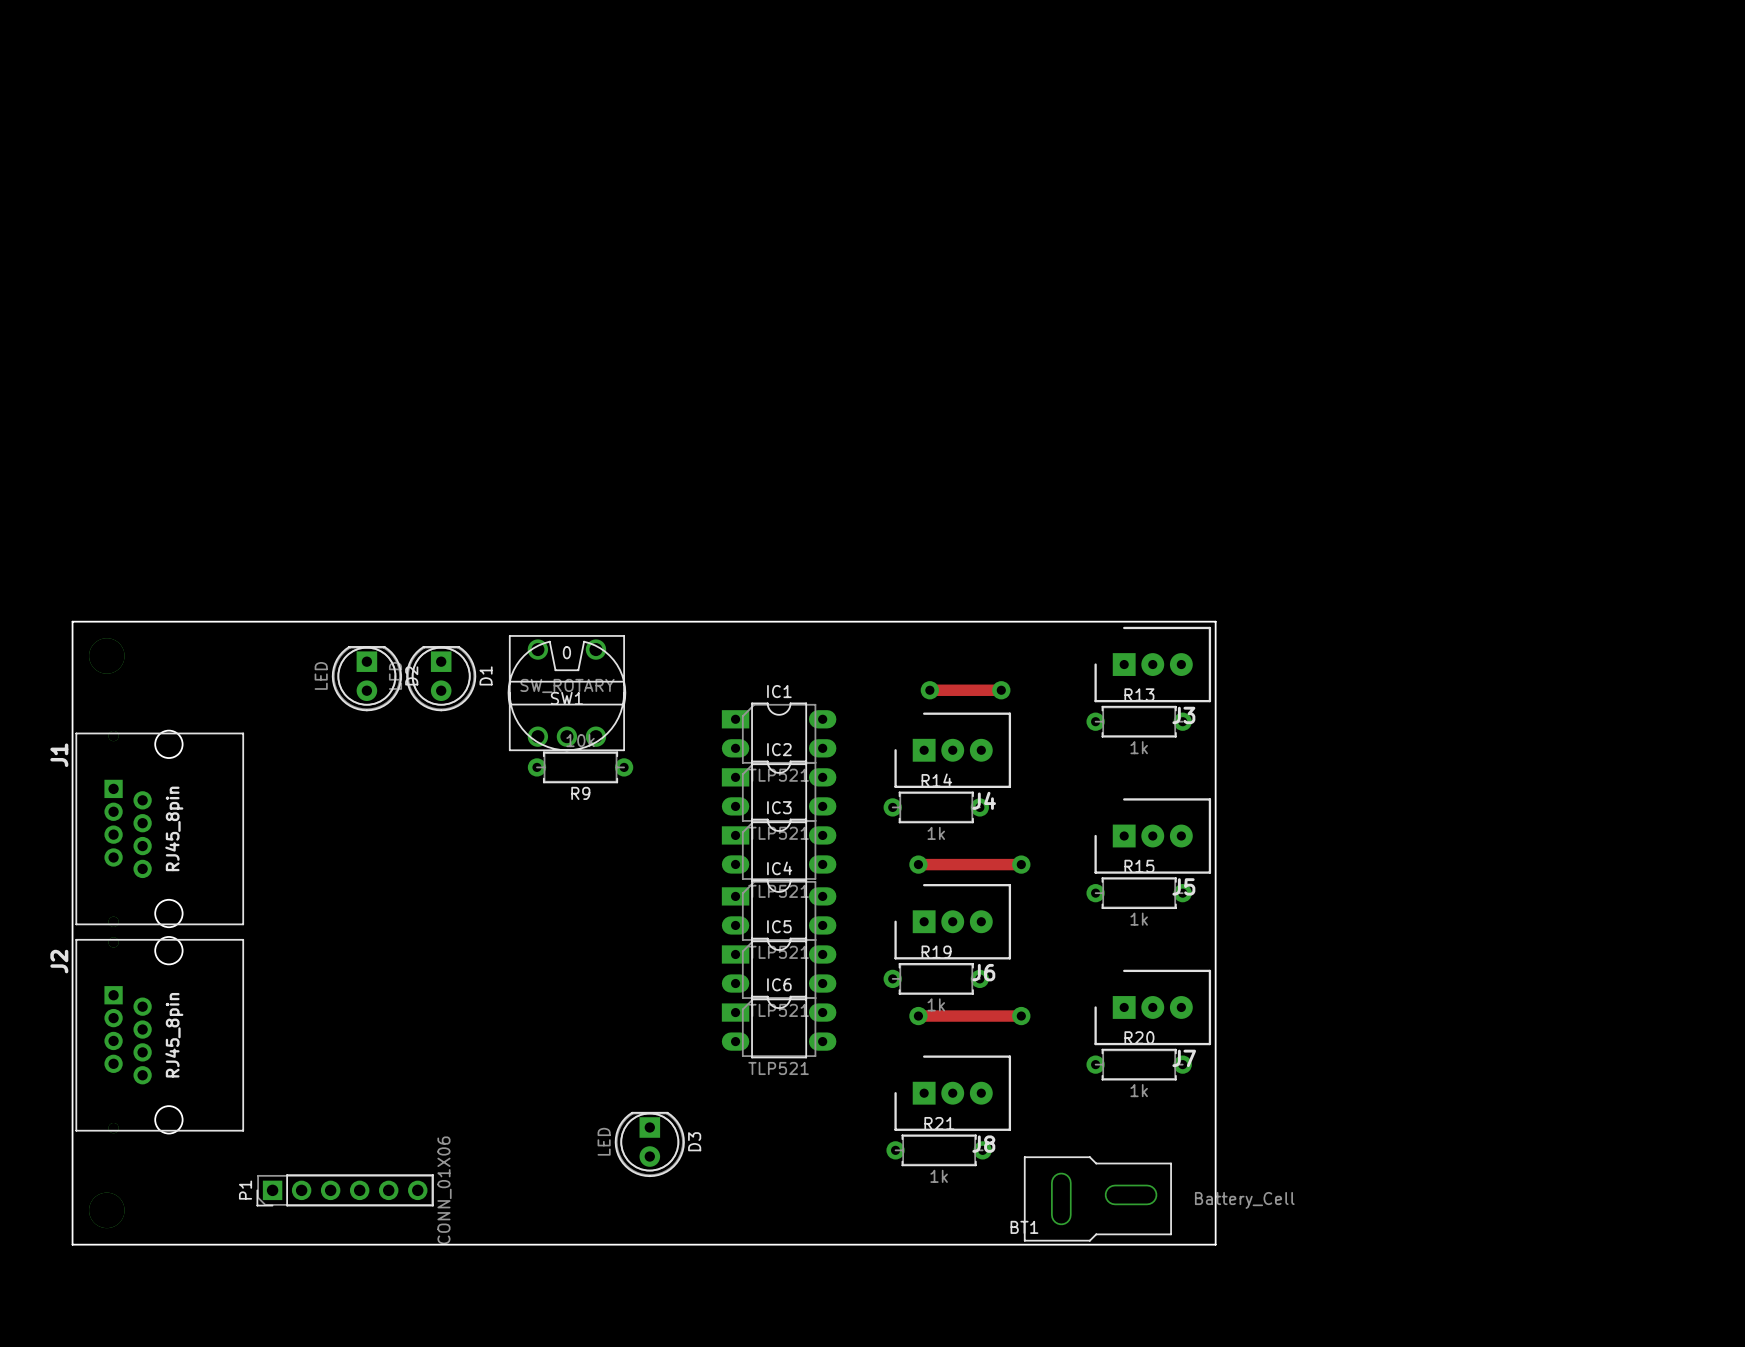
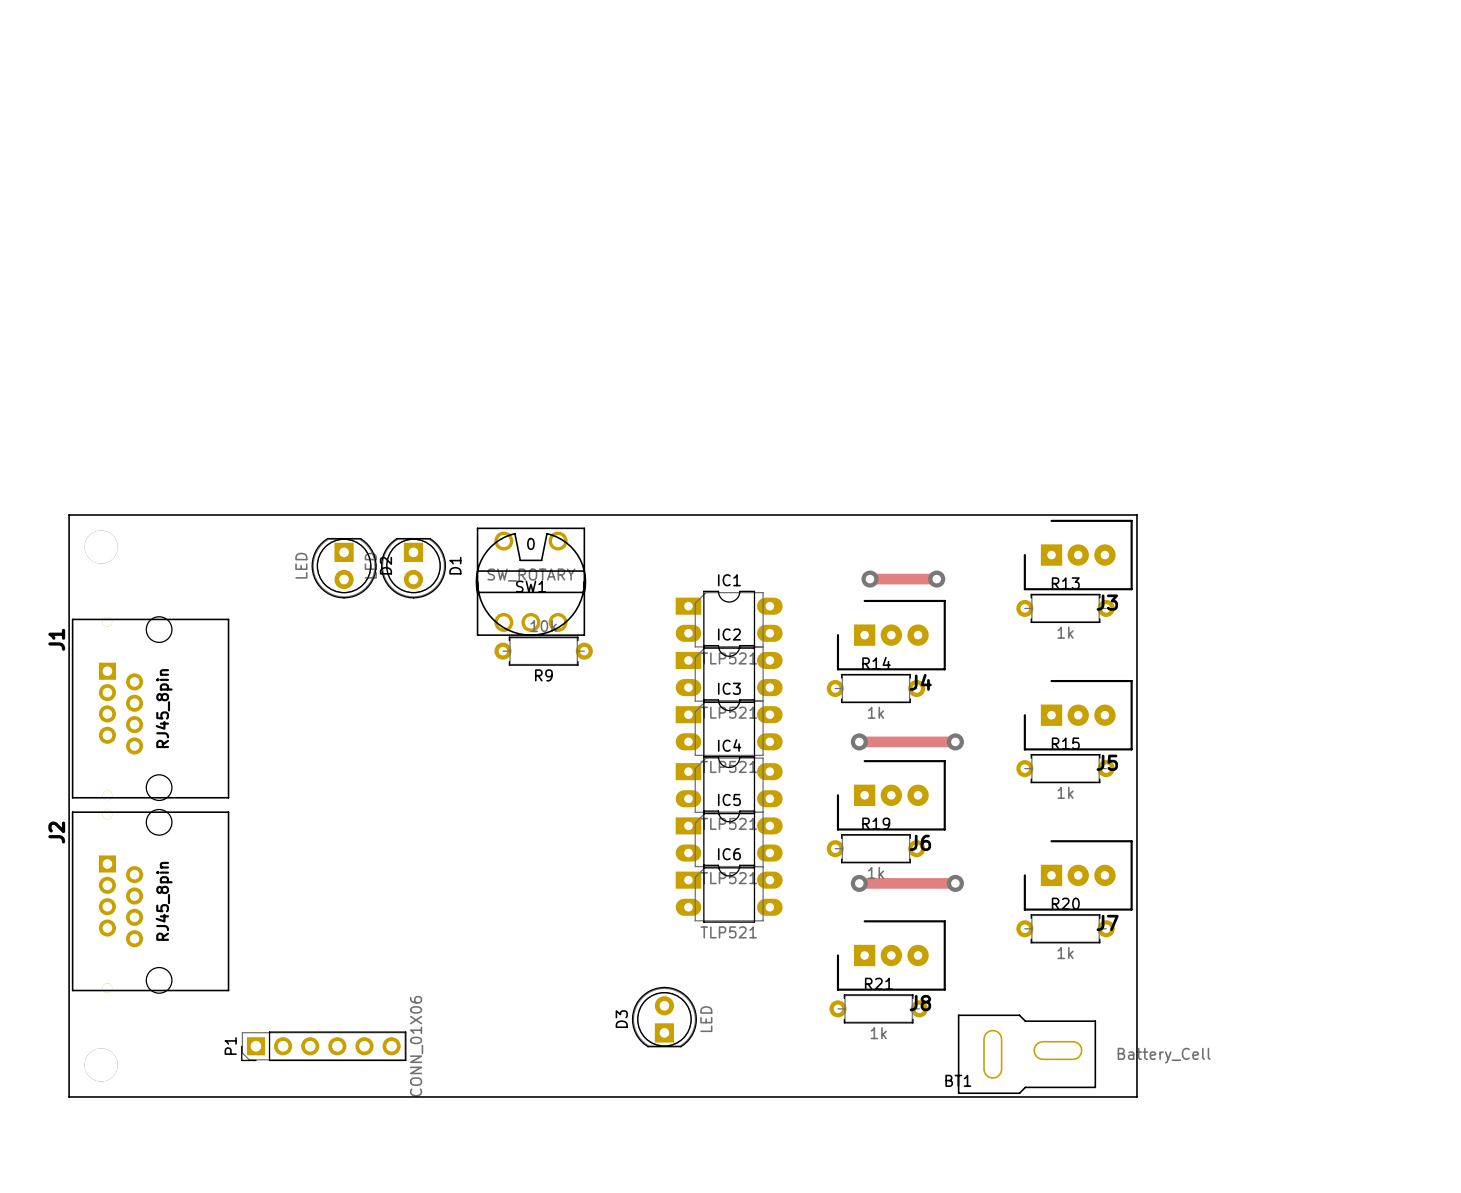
D3 rotation: 0° (649, 1144) -> 180° (664, 1017)
D3 position: (649, 1144) -> (664, 1017)

